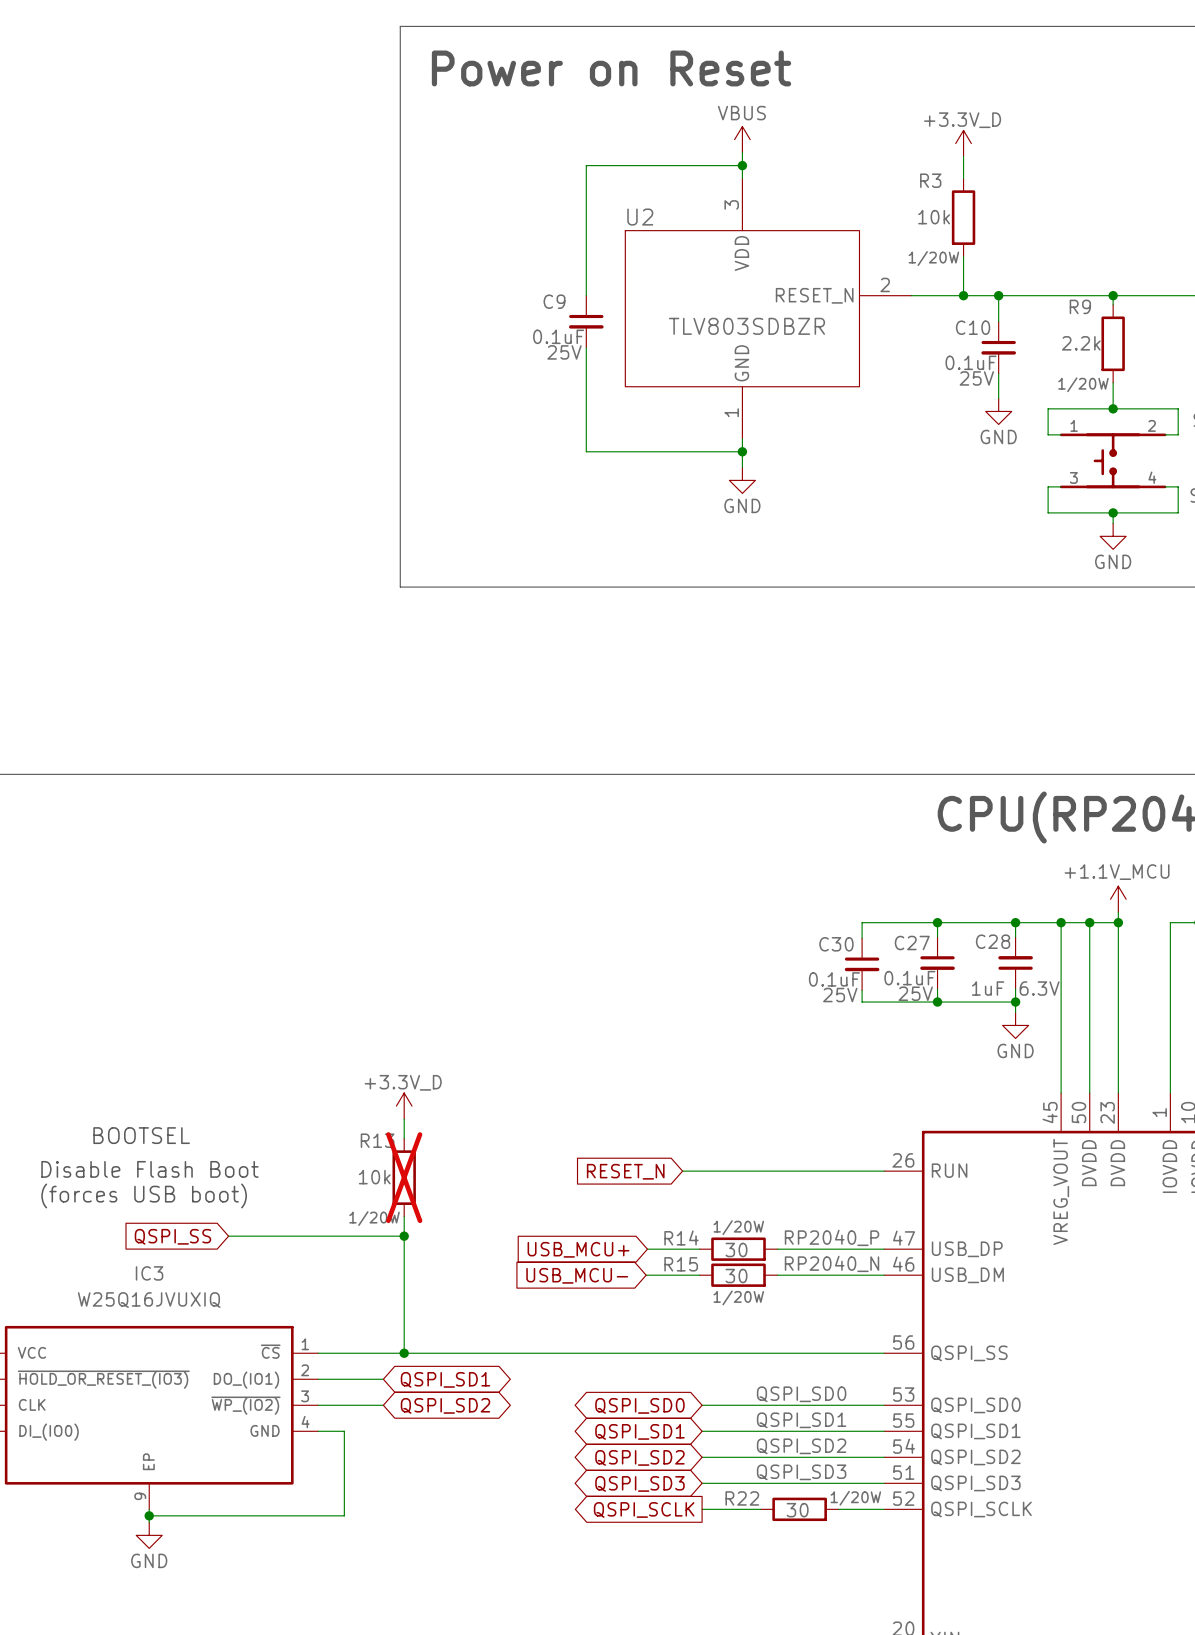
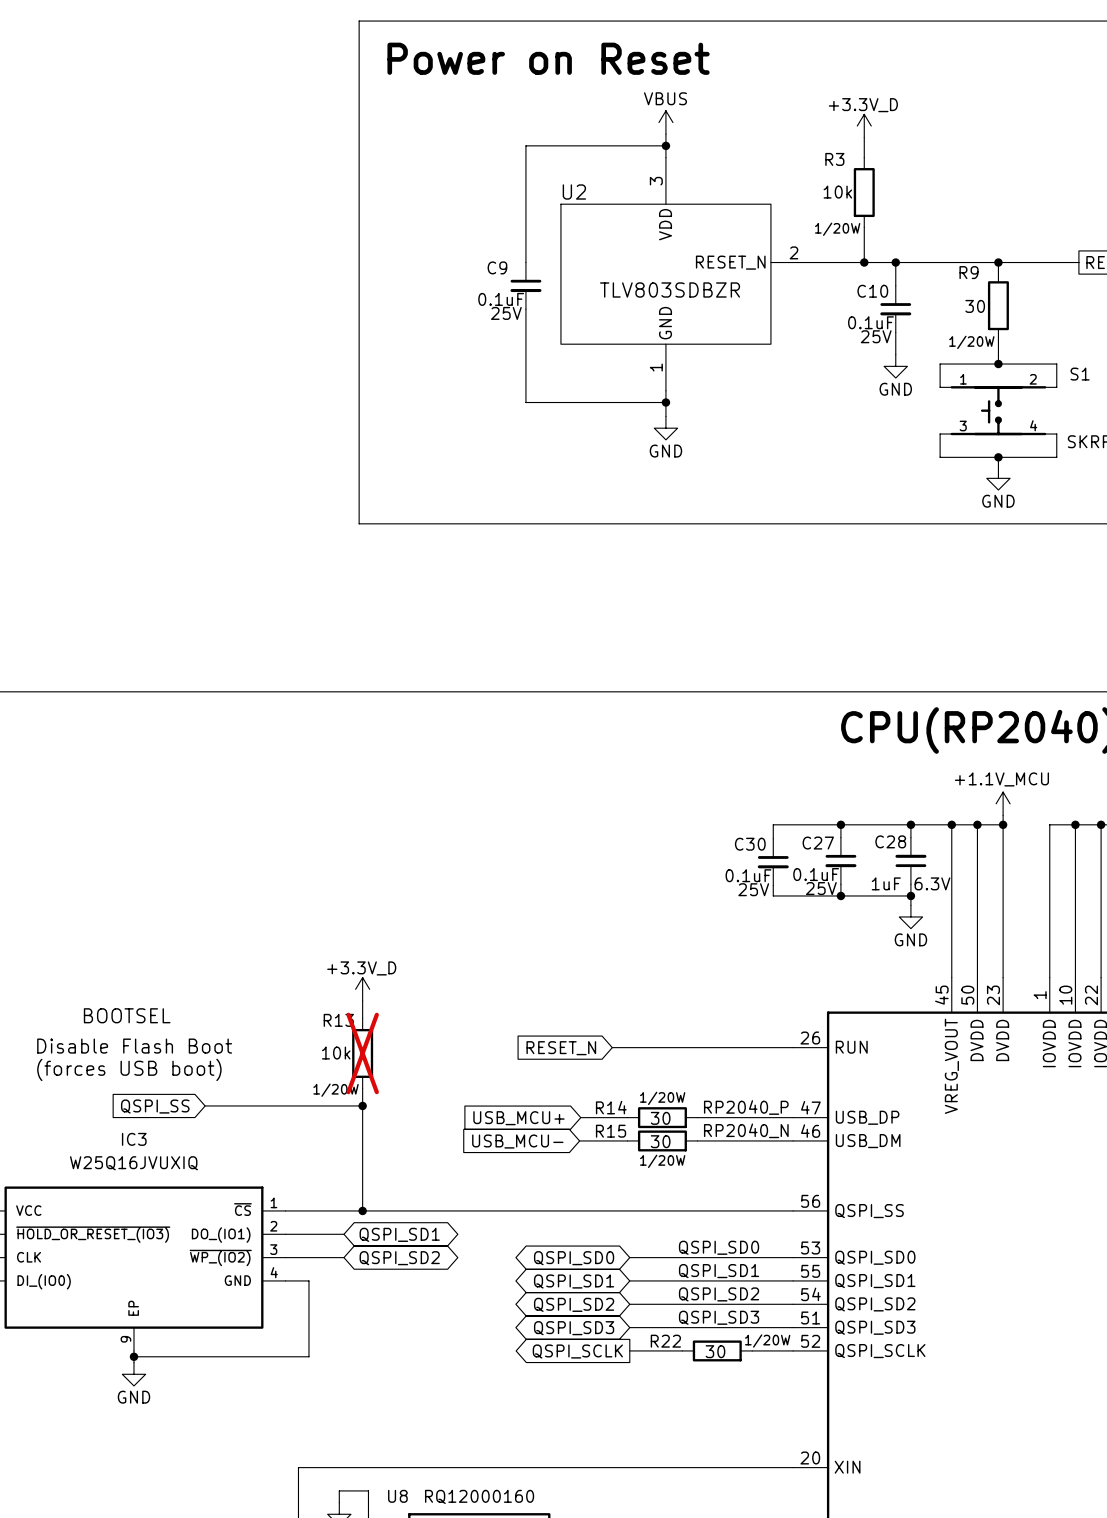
R9 value: 2.2k (1081, 343) -> 30 (975, 306)

